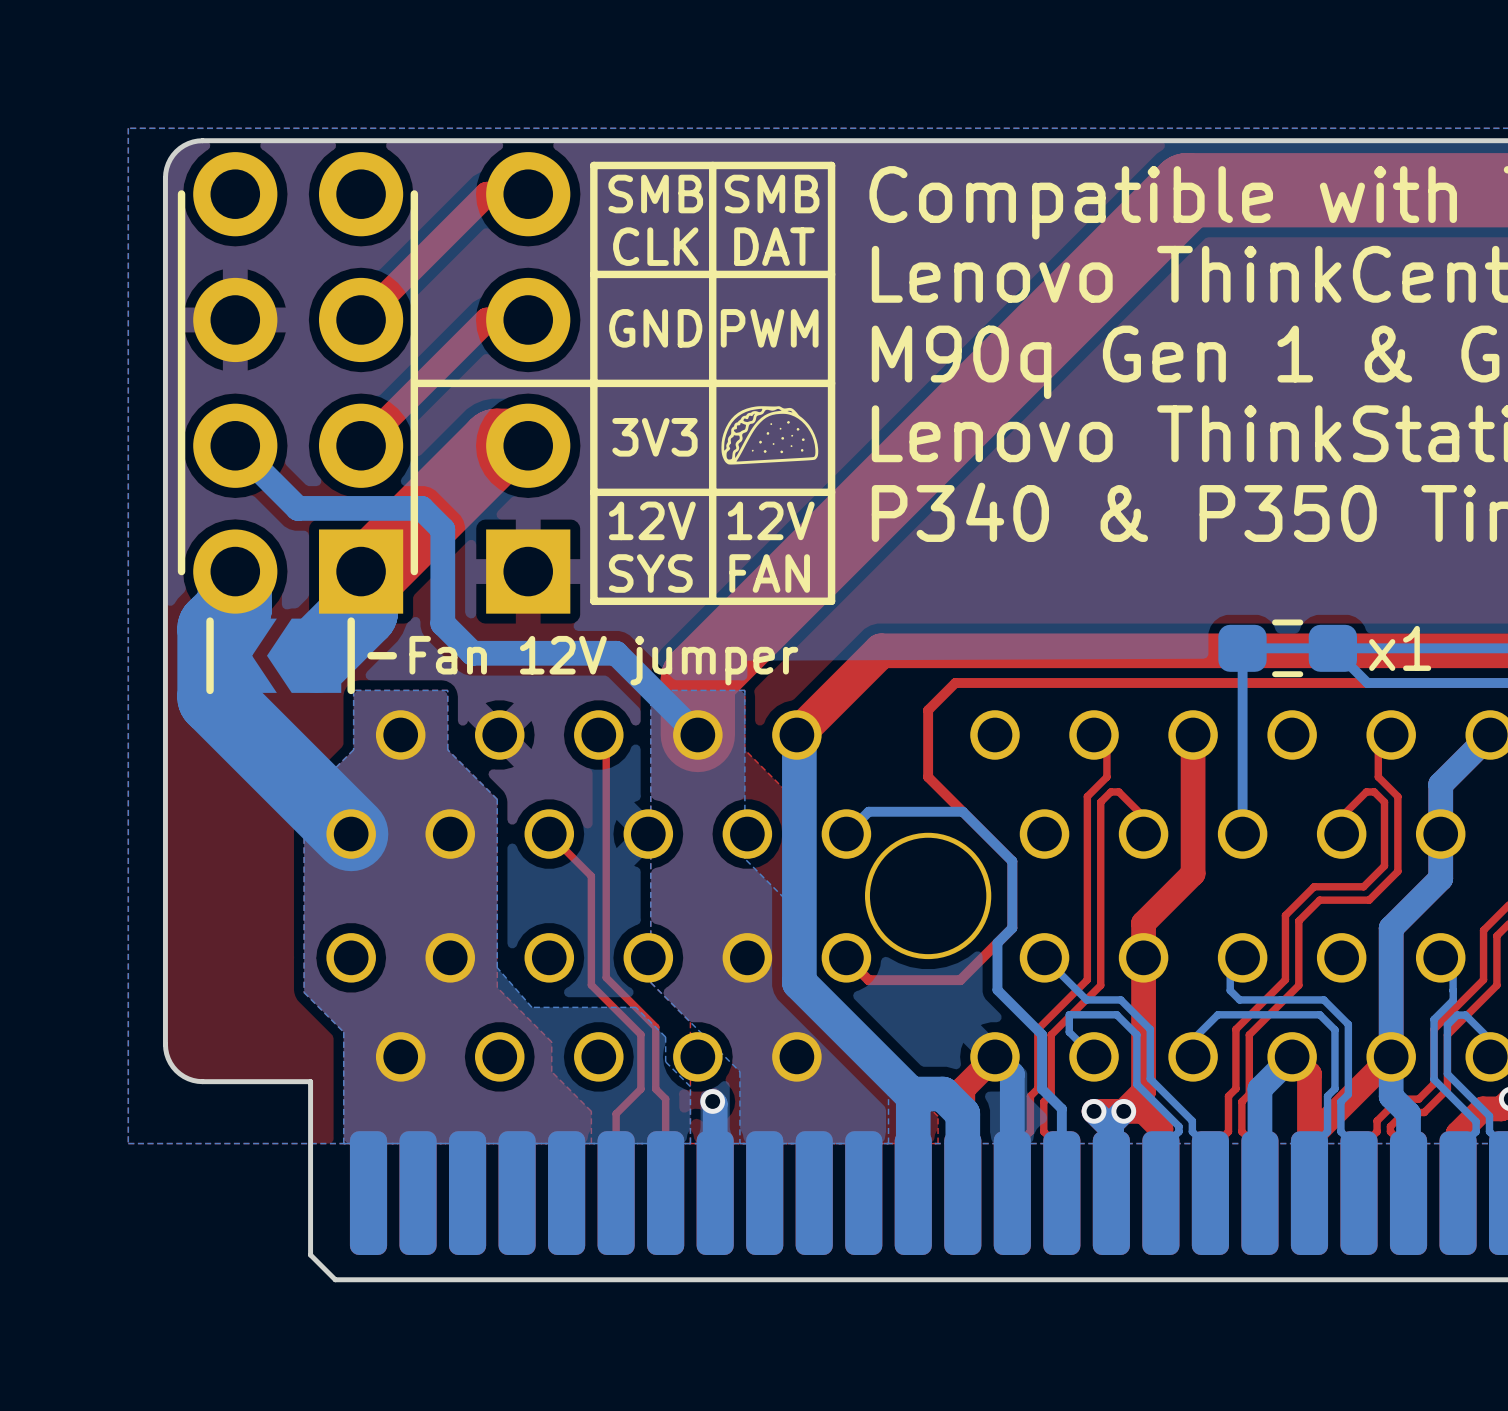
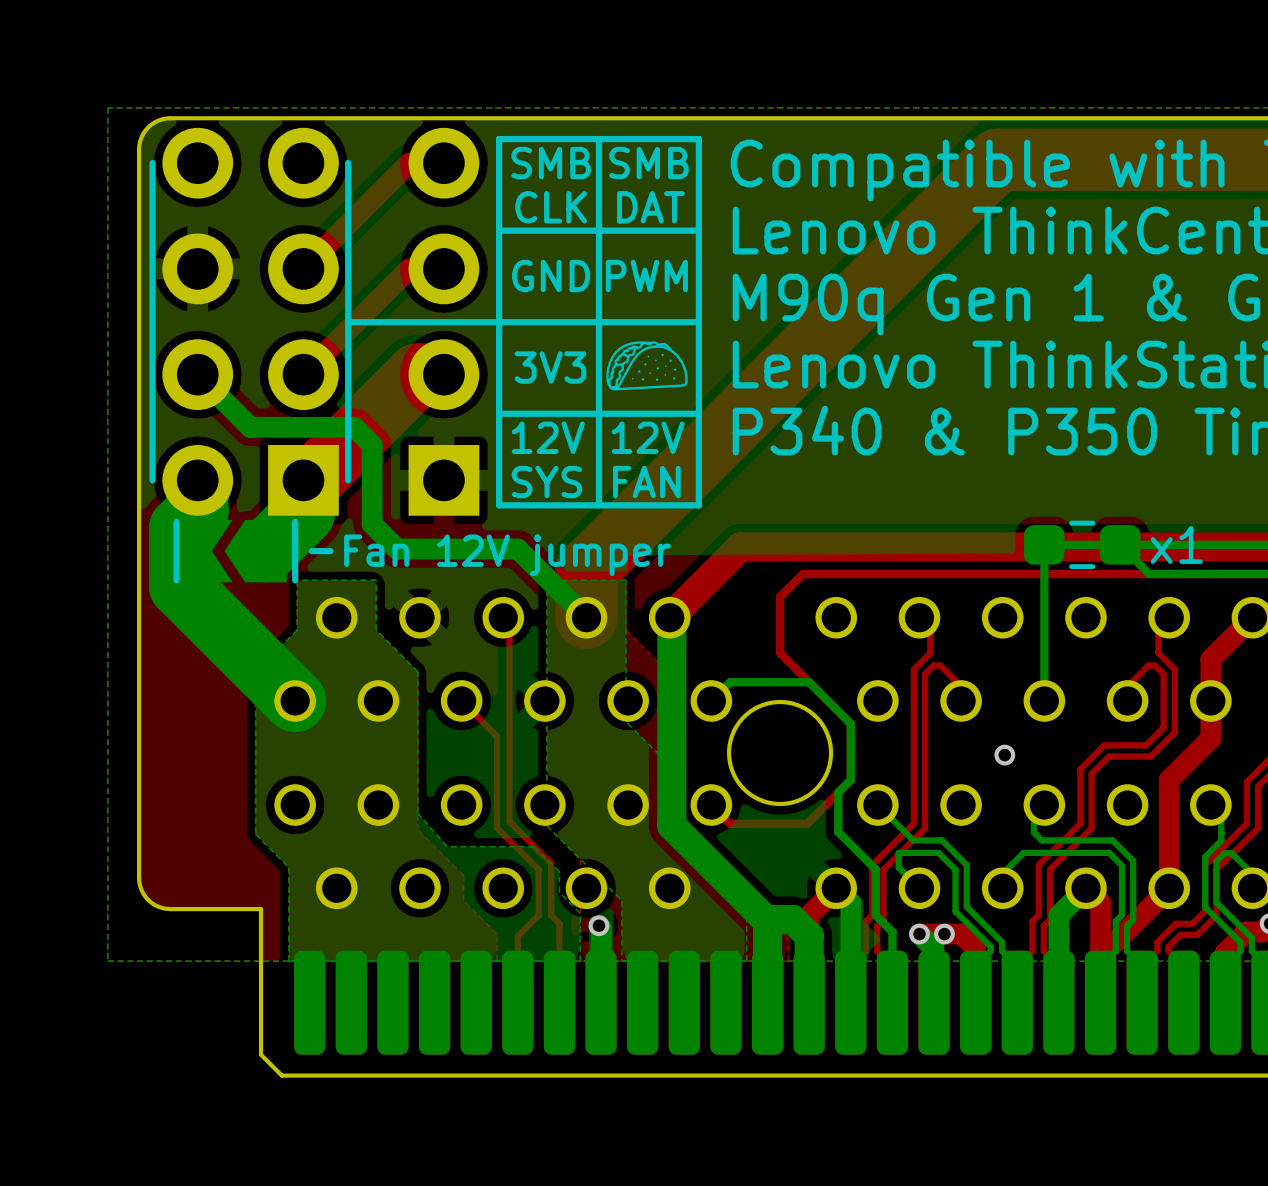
top track: (1193, 734) (1193, 873) (1143, 923) (1143, 1091) (1111, 1123) (1111, 1193) -> none
bottom track: (1490, 734) (1440, 784) (1440, 878) (1391, 928) (1391, 1096) (1408, 1113) (1408, 1193) -> none
via: none -> (1004, 755)

